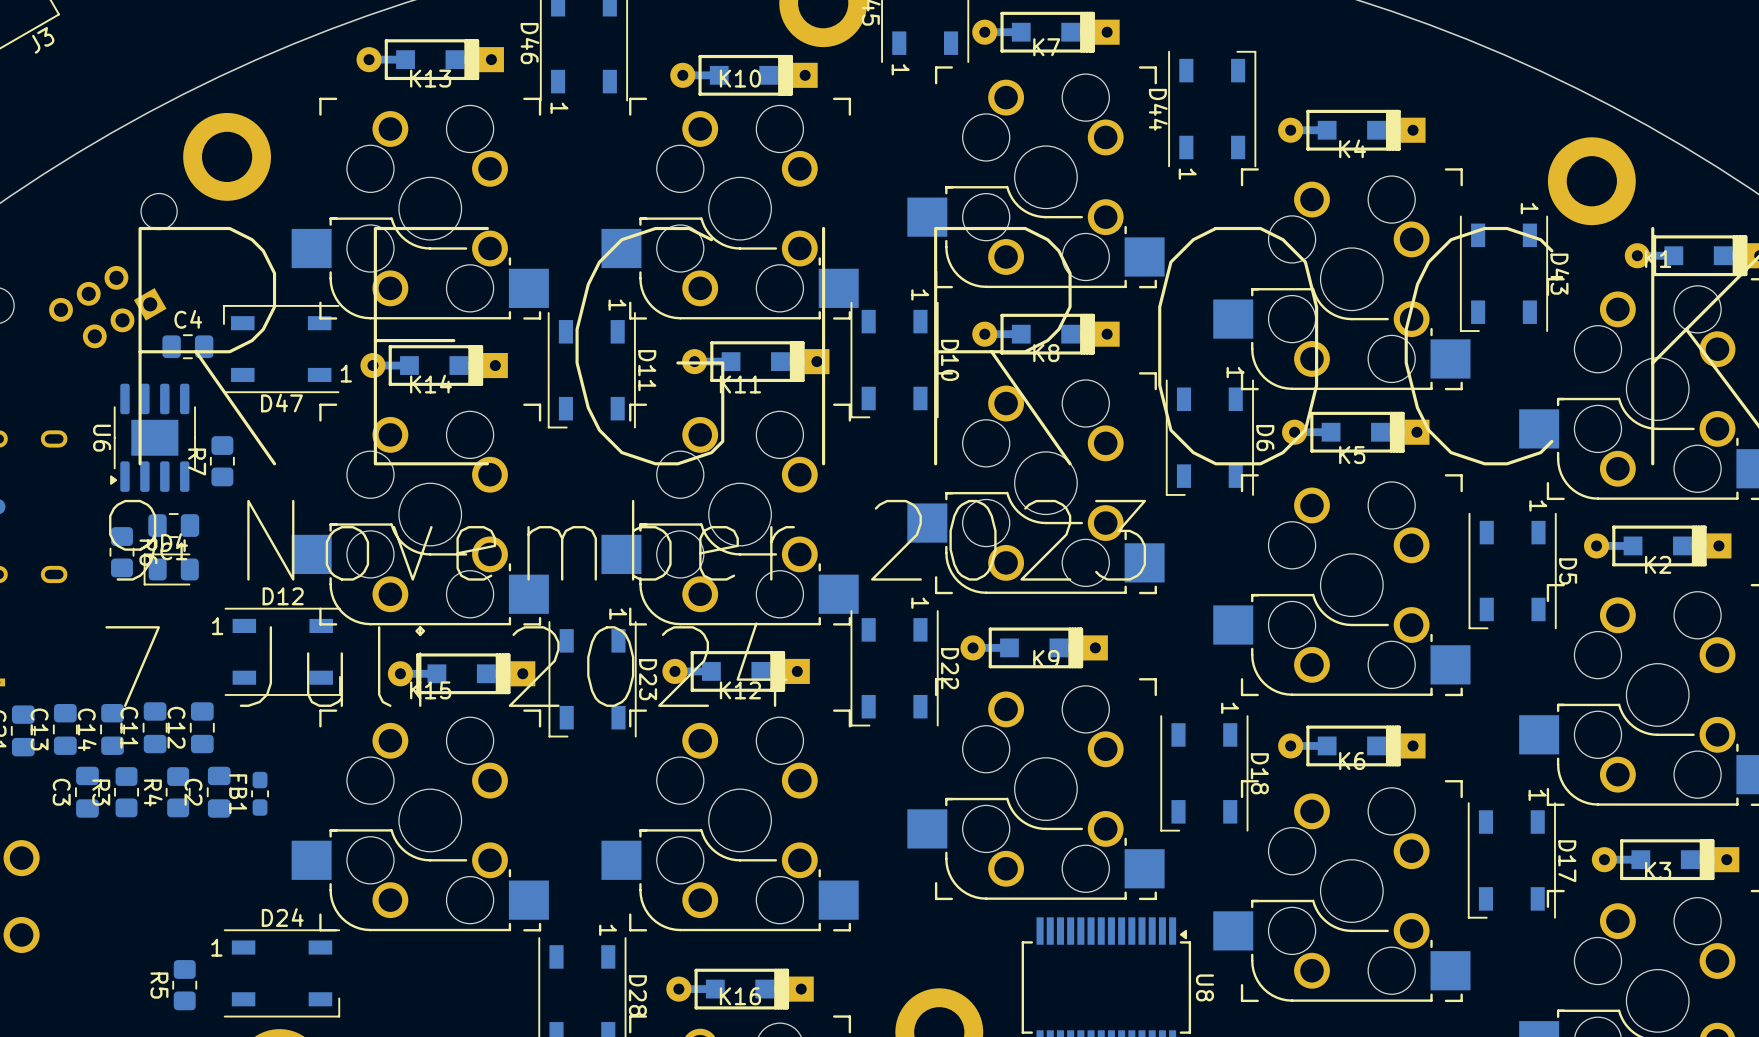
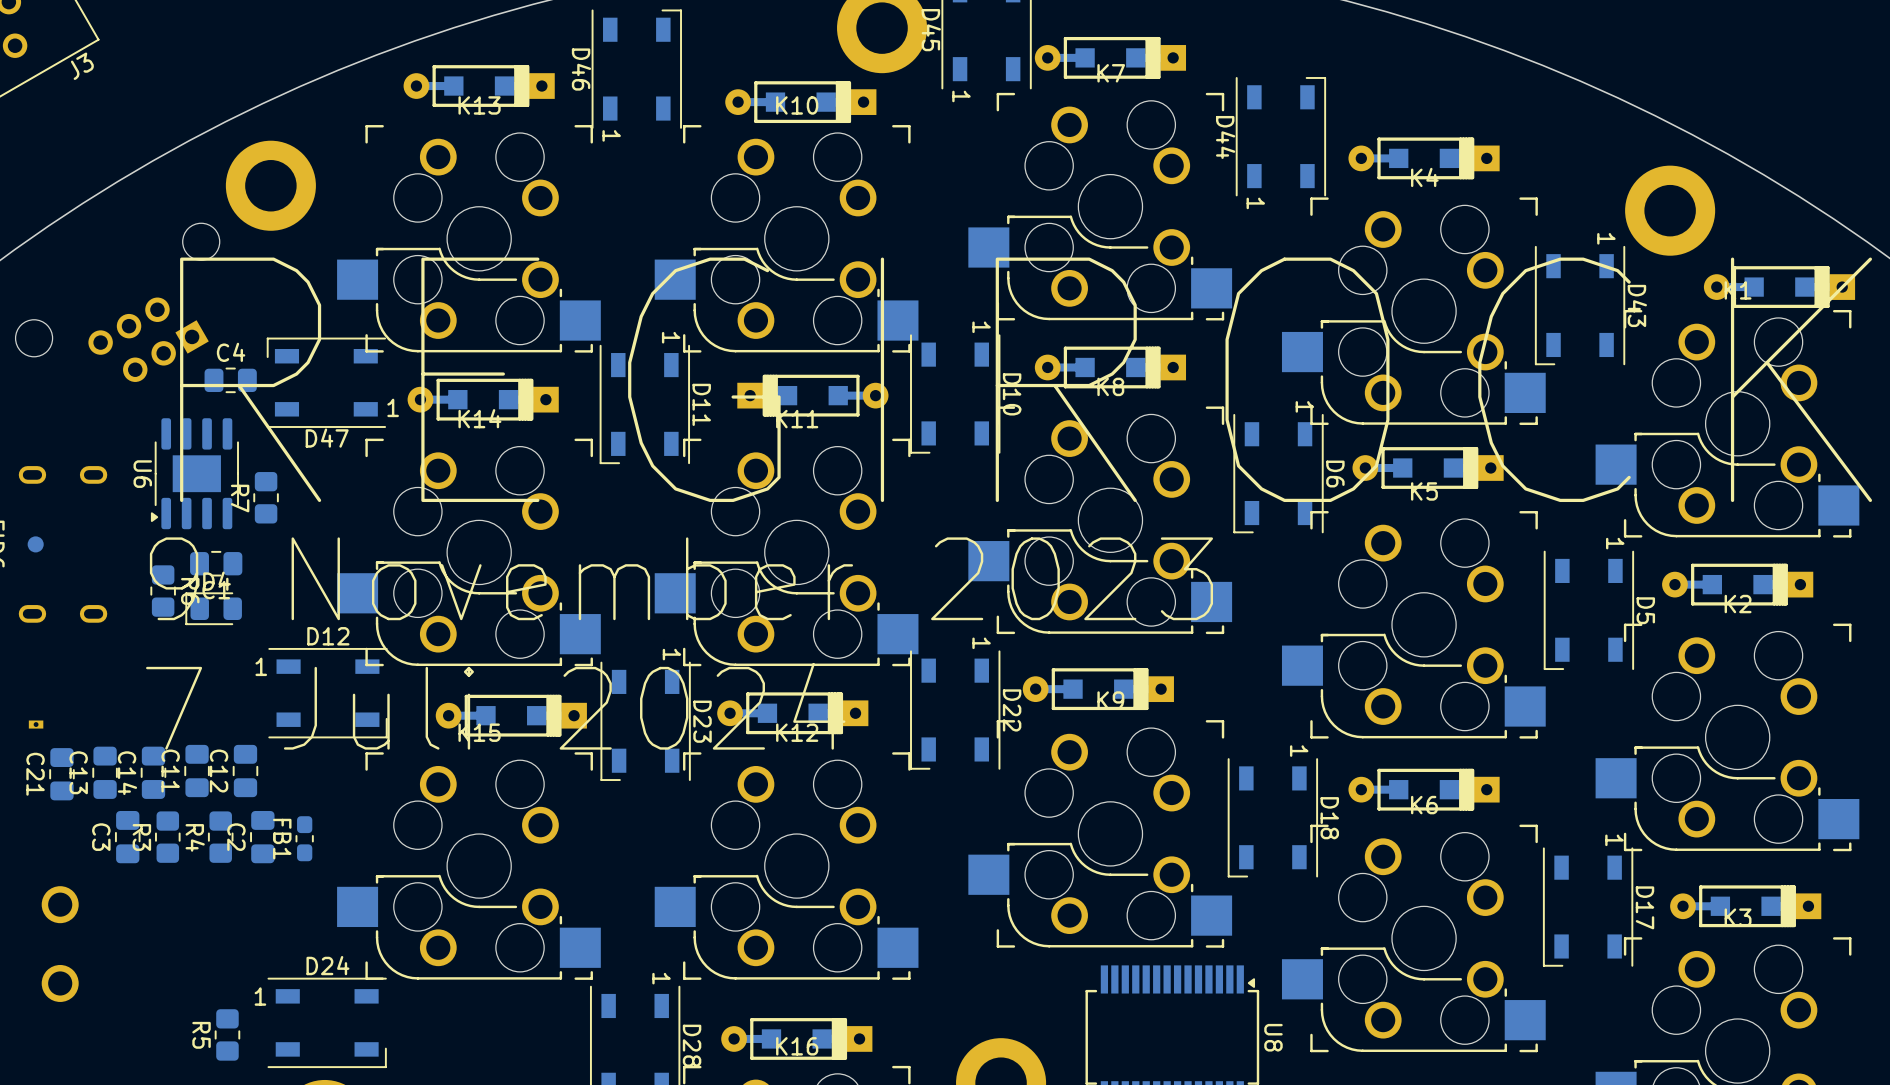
part rotation: 0° (755, 361) -> 180° (812, 395)

